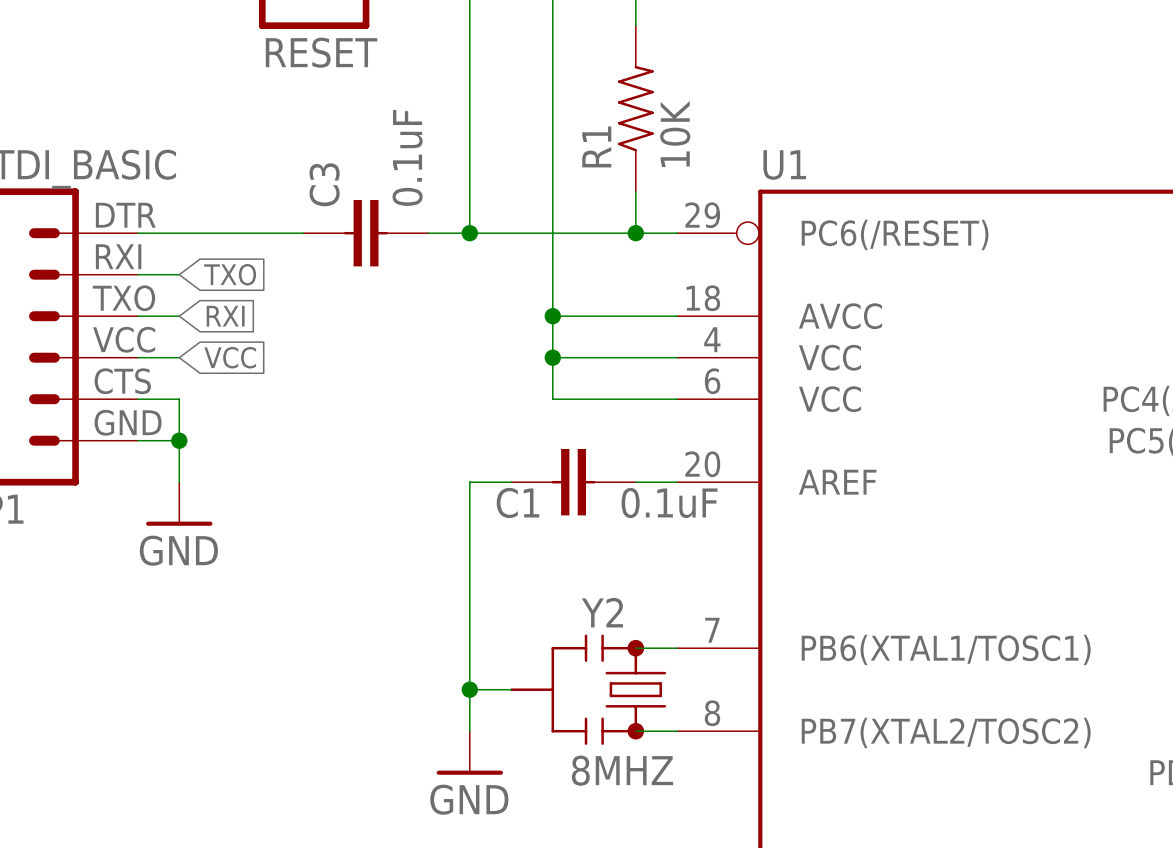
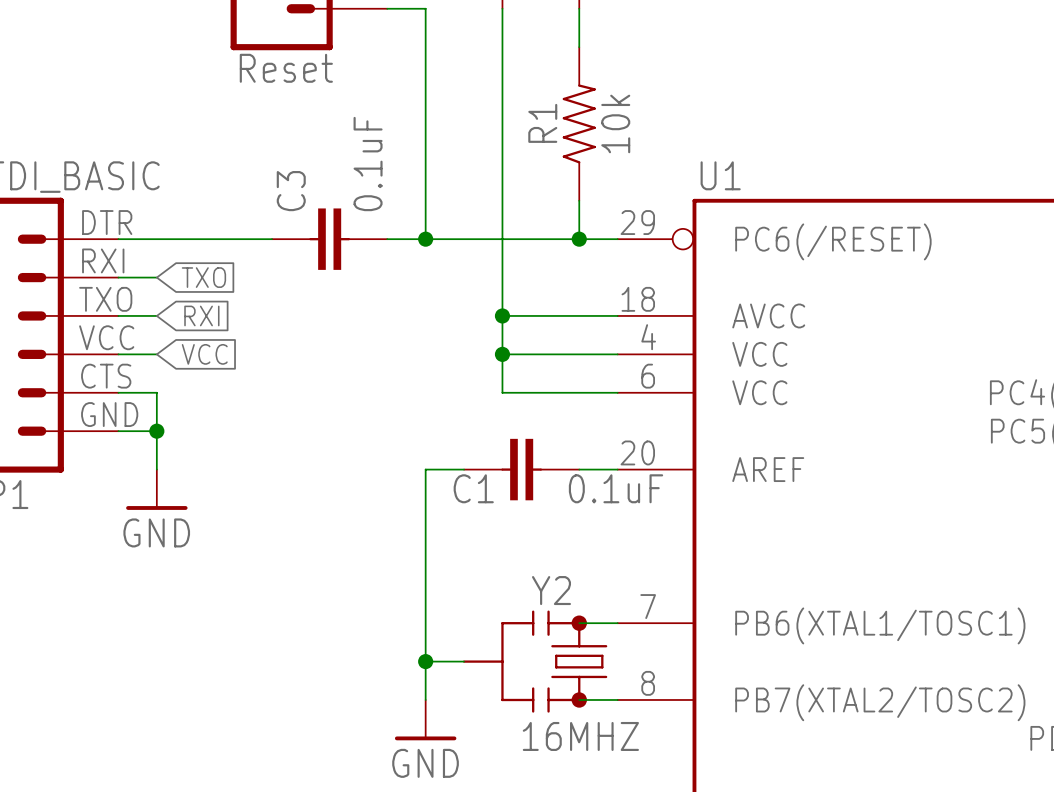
part value: RESET (321, 52) -> Reset (286, 68)
R1 value: 10K (675, 134) -> 10k (615, 123)
R1 name position: R1 (596, 146) -> R1 (542, 123)
Y2 value: 8MHZ (622, 770) -> 16MHZ (580, 736)

